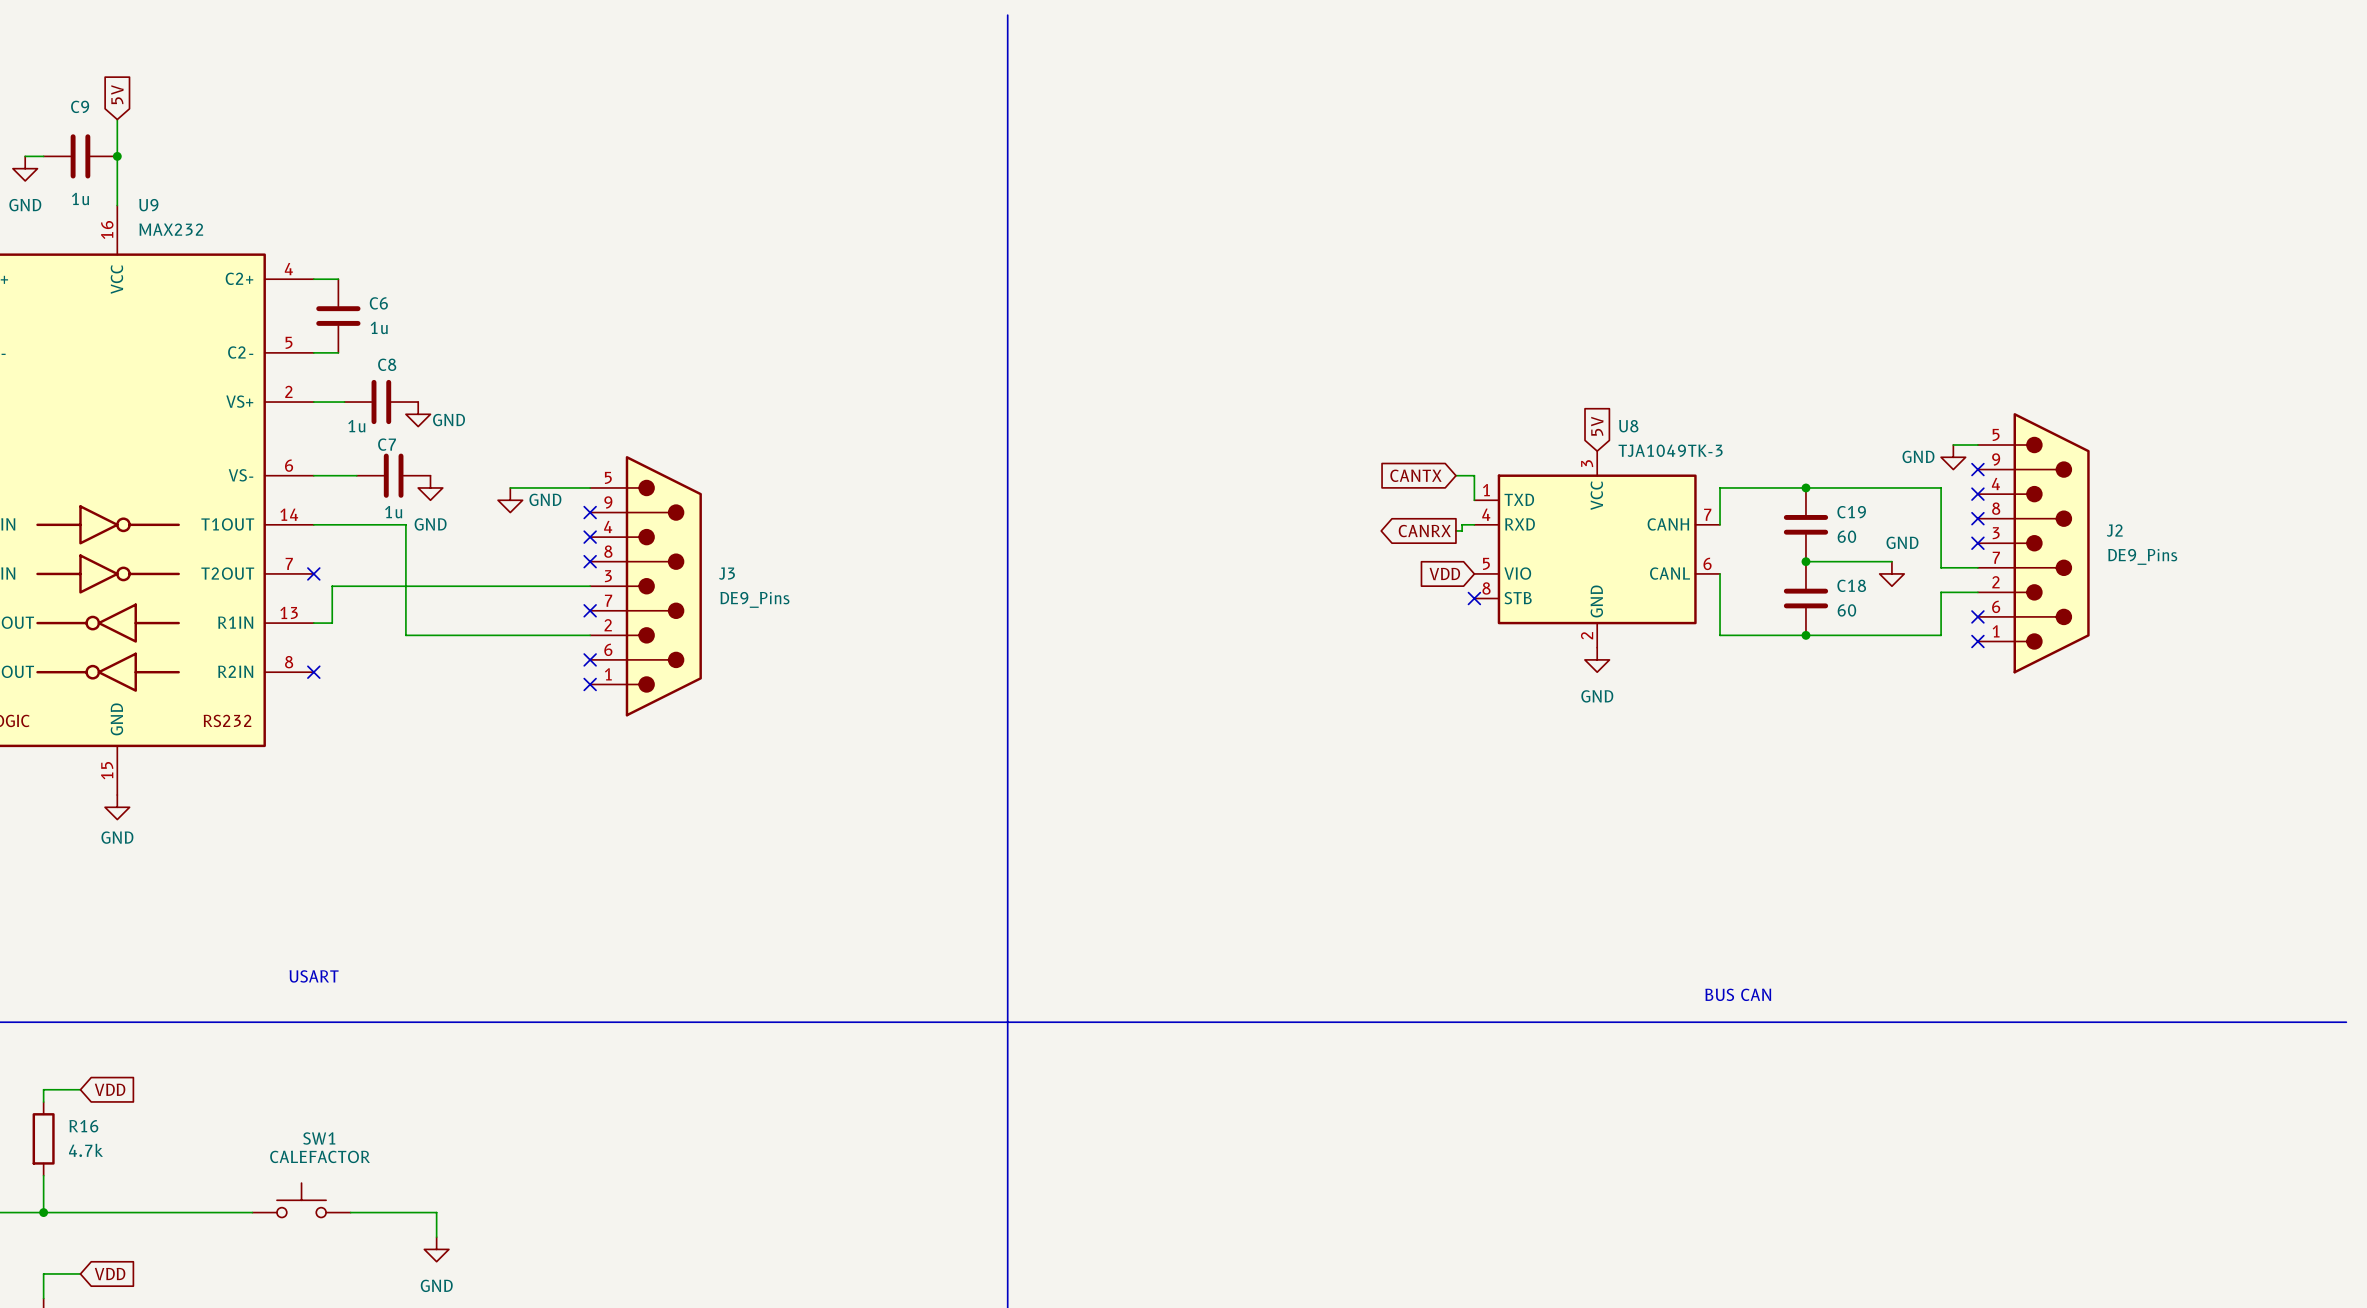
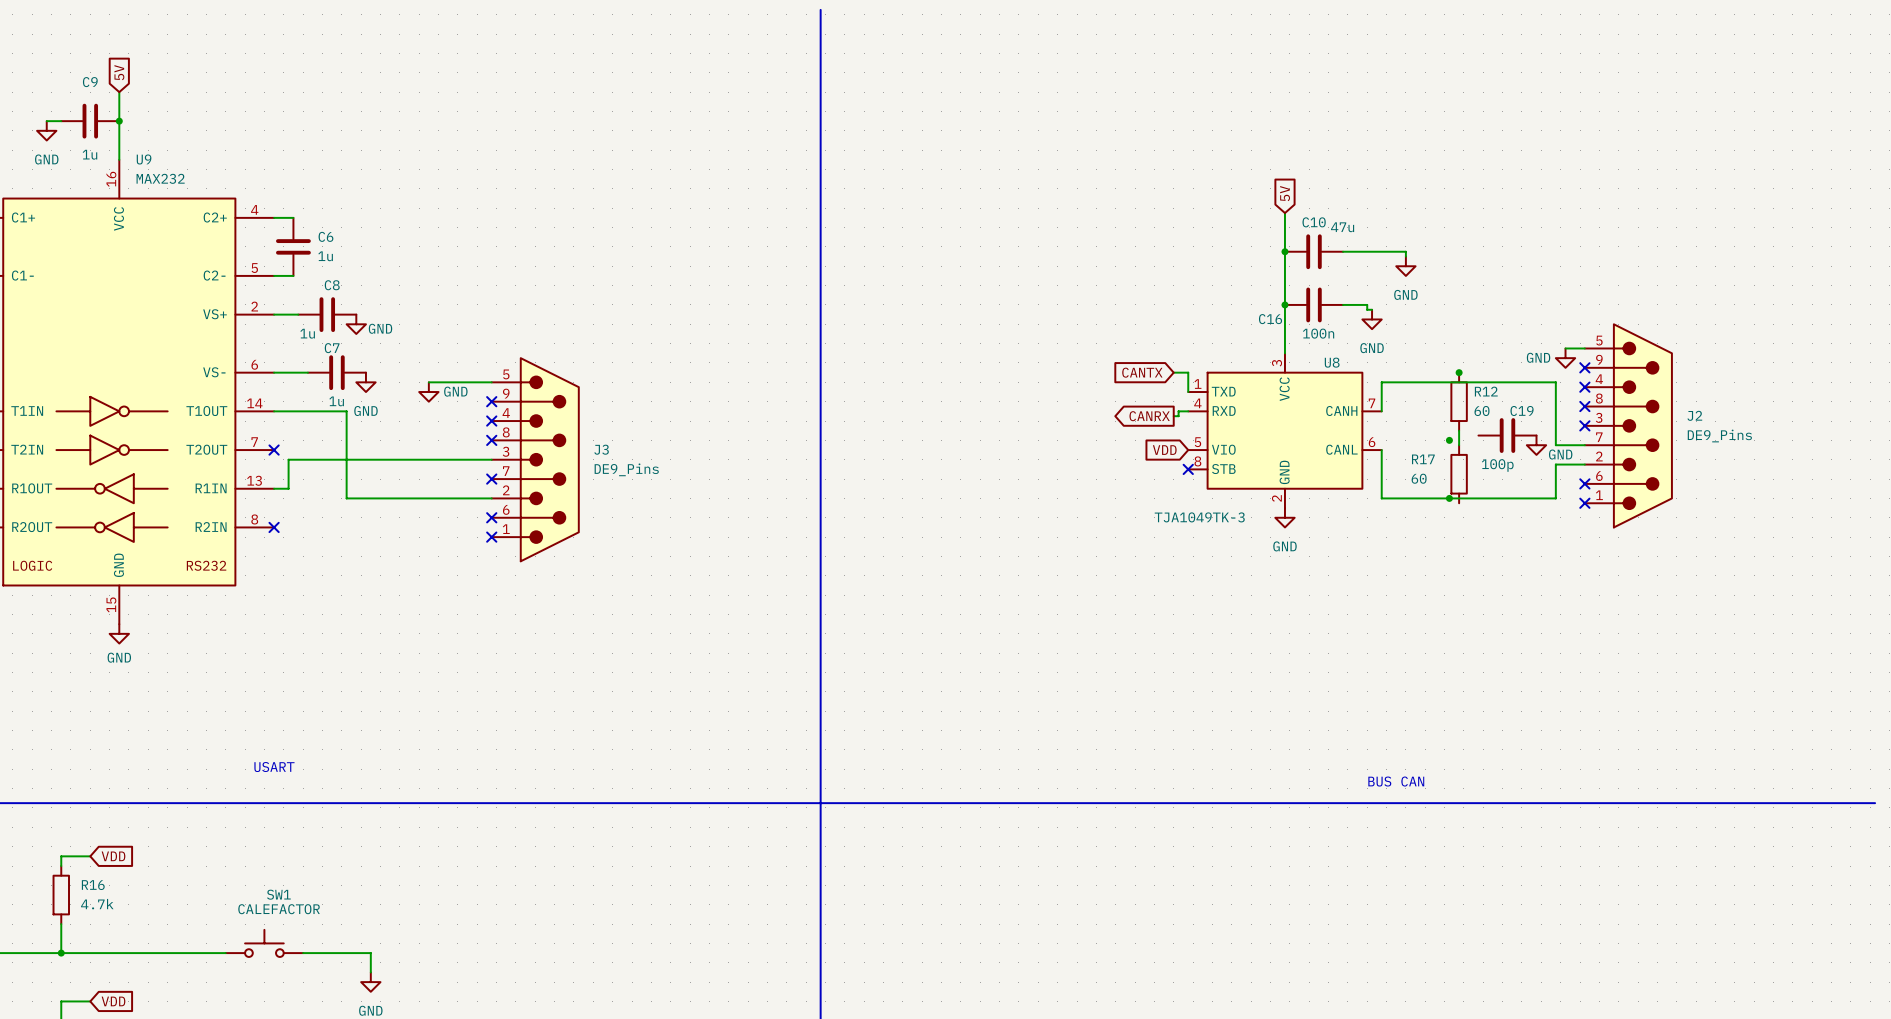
wire: none -> (1284, 213) (1284, 353)
junction: none -> (1284, 251)
C10: none -> 47u (1314, 251)
wire: none -> (1343, 251) (1405, 251) (1405, 256)
power symbol: none -> GND (1405, 266)
junction: none -> (1284, 304)
C16: none -> 100n (1314, 304)
wire: none -> (1343, 304) (1367, 304) (1367, 309) (1372, 309)
power symbol: none -> GND (1372, 319)
global label position: 5V (1597, 426) -> 5V (1285, 193)
U8 name position: U8 (1628, 426) -> U8 (1332, 362)
U8 value position: TJA1049TK-3 (1670, 450) -> TJA1049TK-3 (1199, 517)
junction position: (1805, 487) -> (1459, 372)
R12: none -> 60 (1459, 401)
C19 name position: C19 (1851, 512) -> C19 (1522, 410)
C19 rotation: 0° (1805, 524) -> 90° clockwise (1507, 435)
C19 position: (1805, 524) -> (1507, 435)
C19 value: 60 (1846, 536) -> 100p (1497, 465)
power symbol text position: GND (1902, 542) -> GND (1560, 454)
wire: none -> (1459, 430) (1459, 445)
wire: (1805, 561) (1891, 561) -> none
power symbol position: GND (1891, 573) -> GND (1536, 445)
C18: 60 (1805, 598) -> none
R17: none -> 60 (1459, 474)

